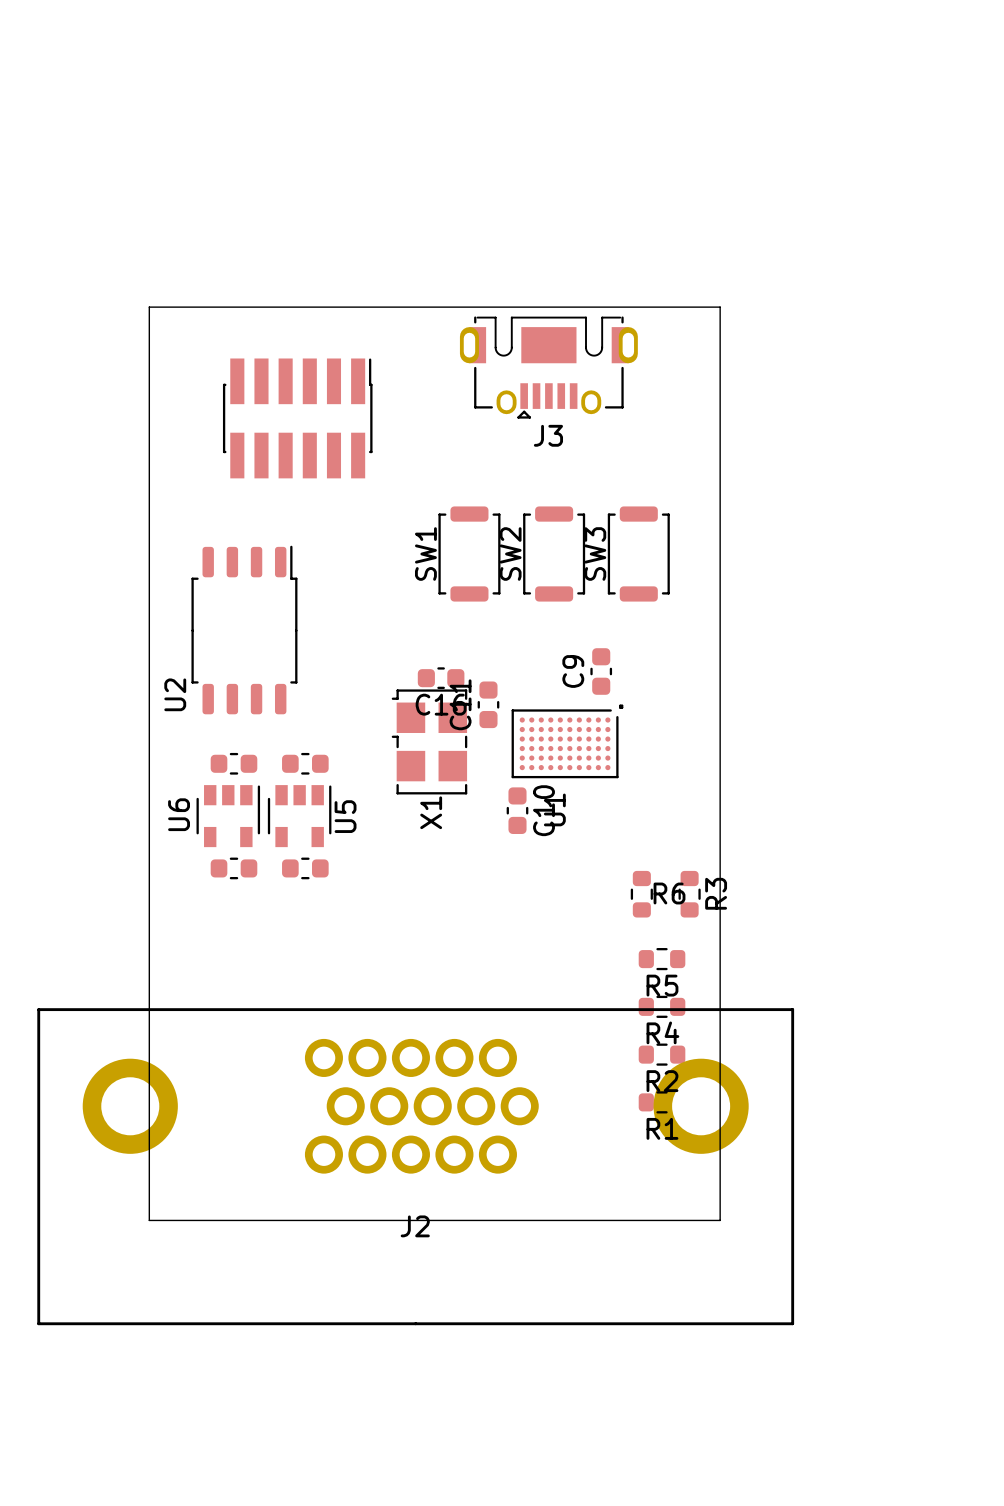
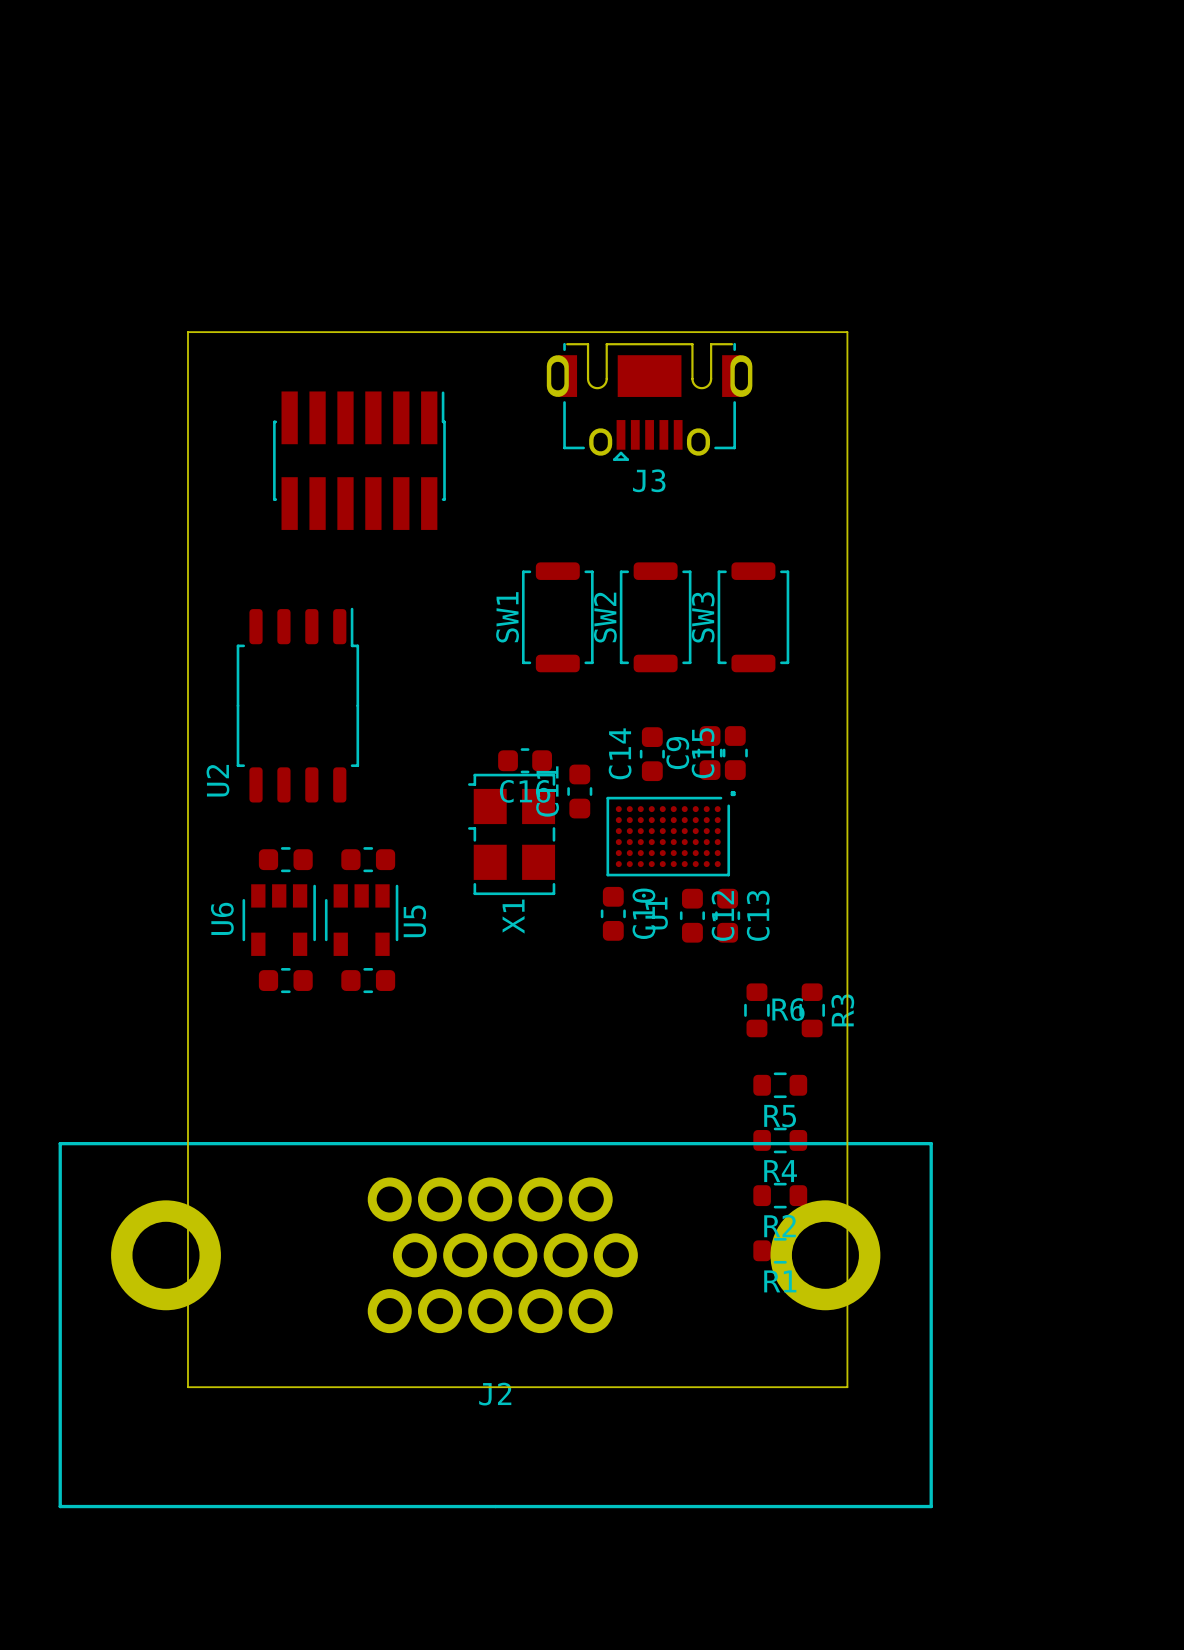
C15: none -> (735, 753)
C14: none -> (652, 754)
C12: none -> (692, 915)
C13: none -> (727, 915)

